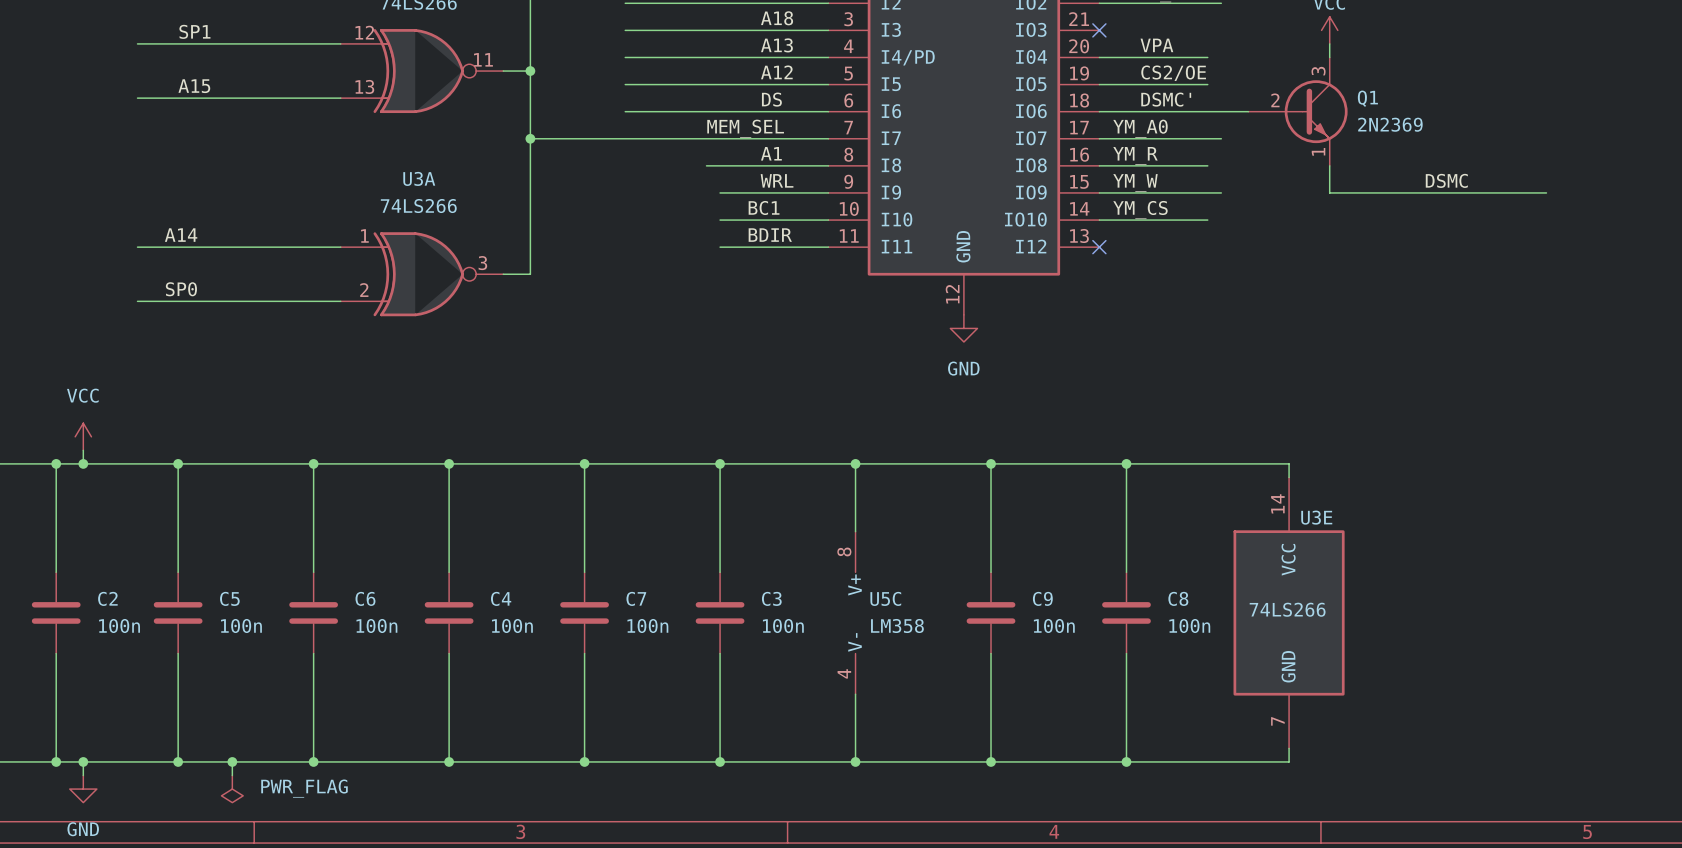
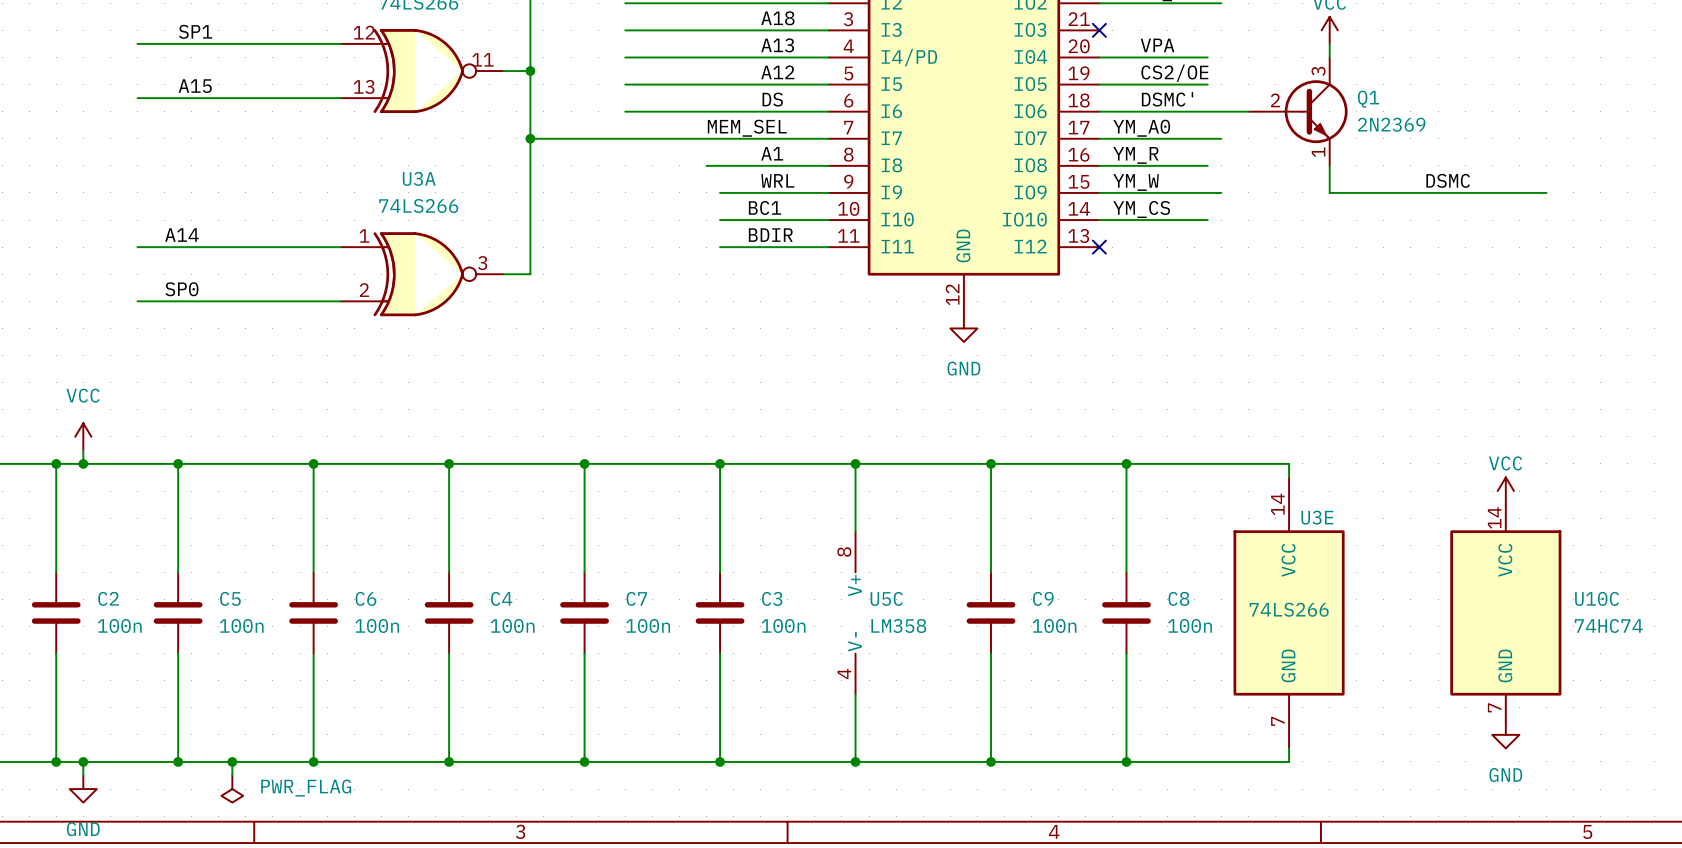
power symbol: none -> VCC (1505, 491)
U10C: none -> 74HC74 (1505, 612)
power symbol: none -> GND (1505, 734)

